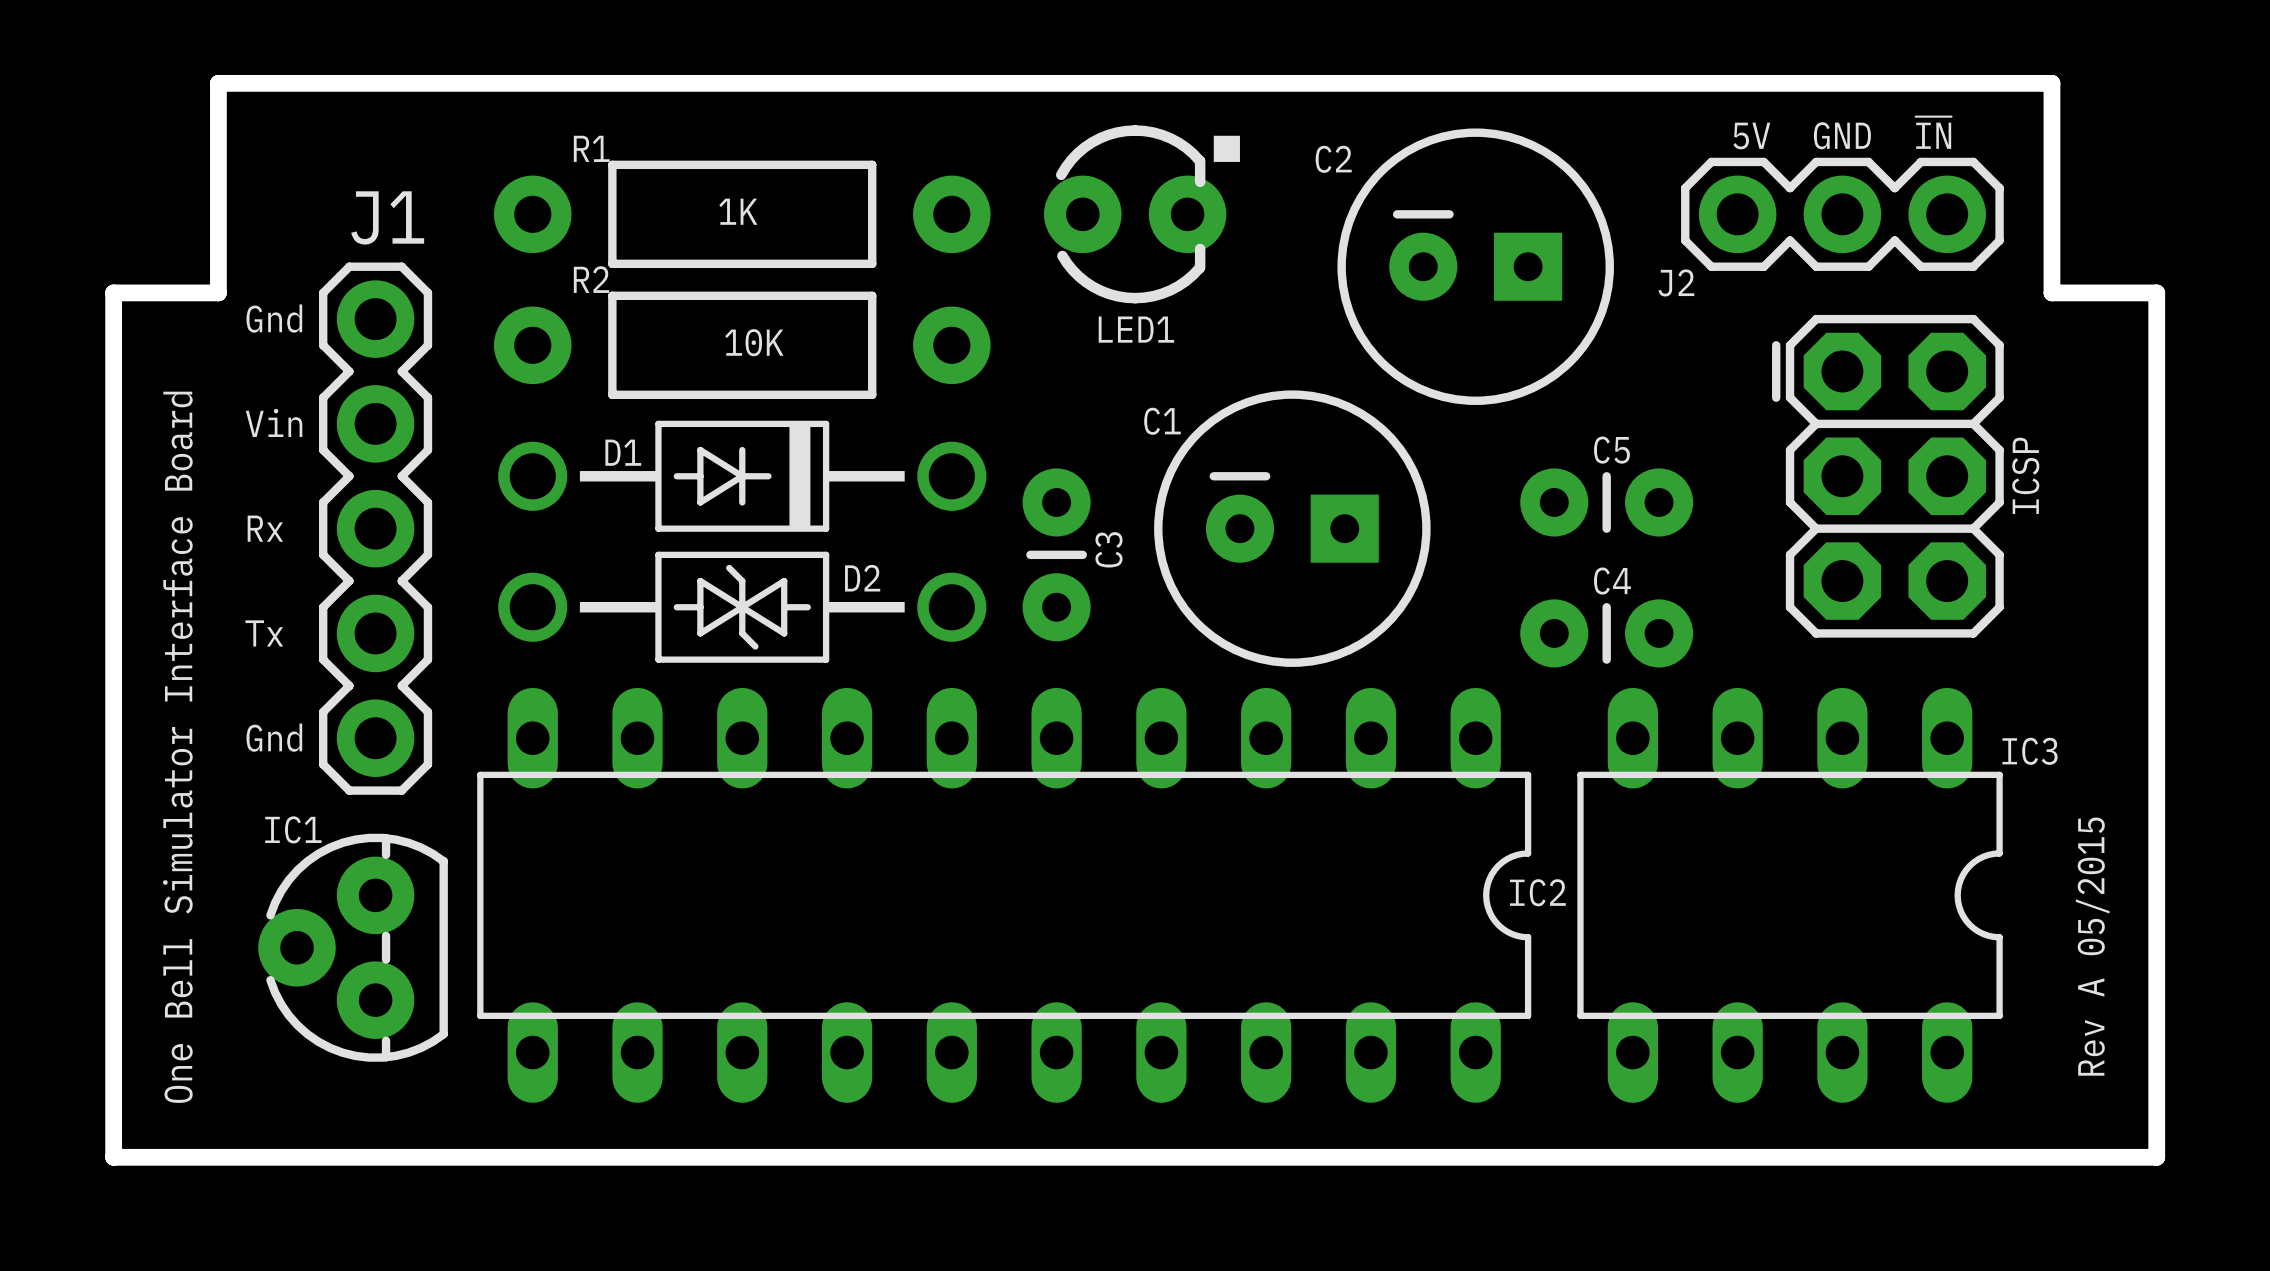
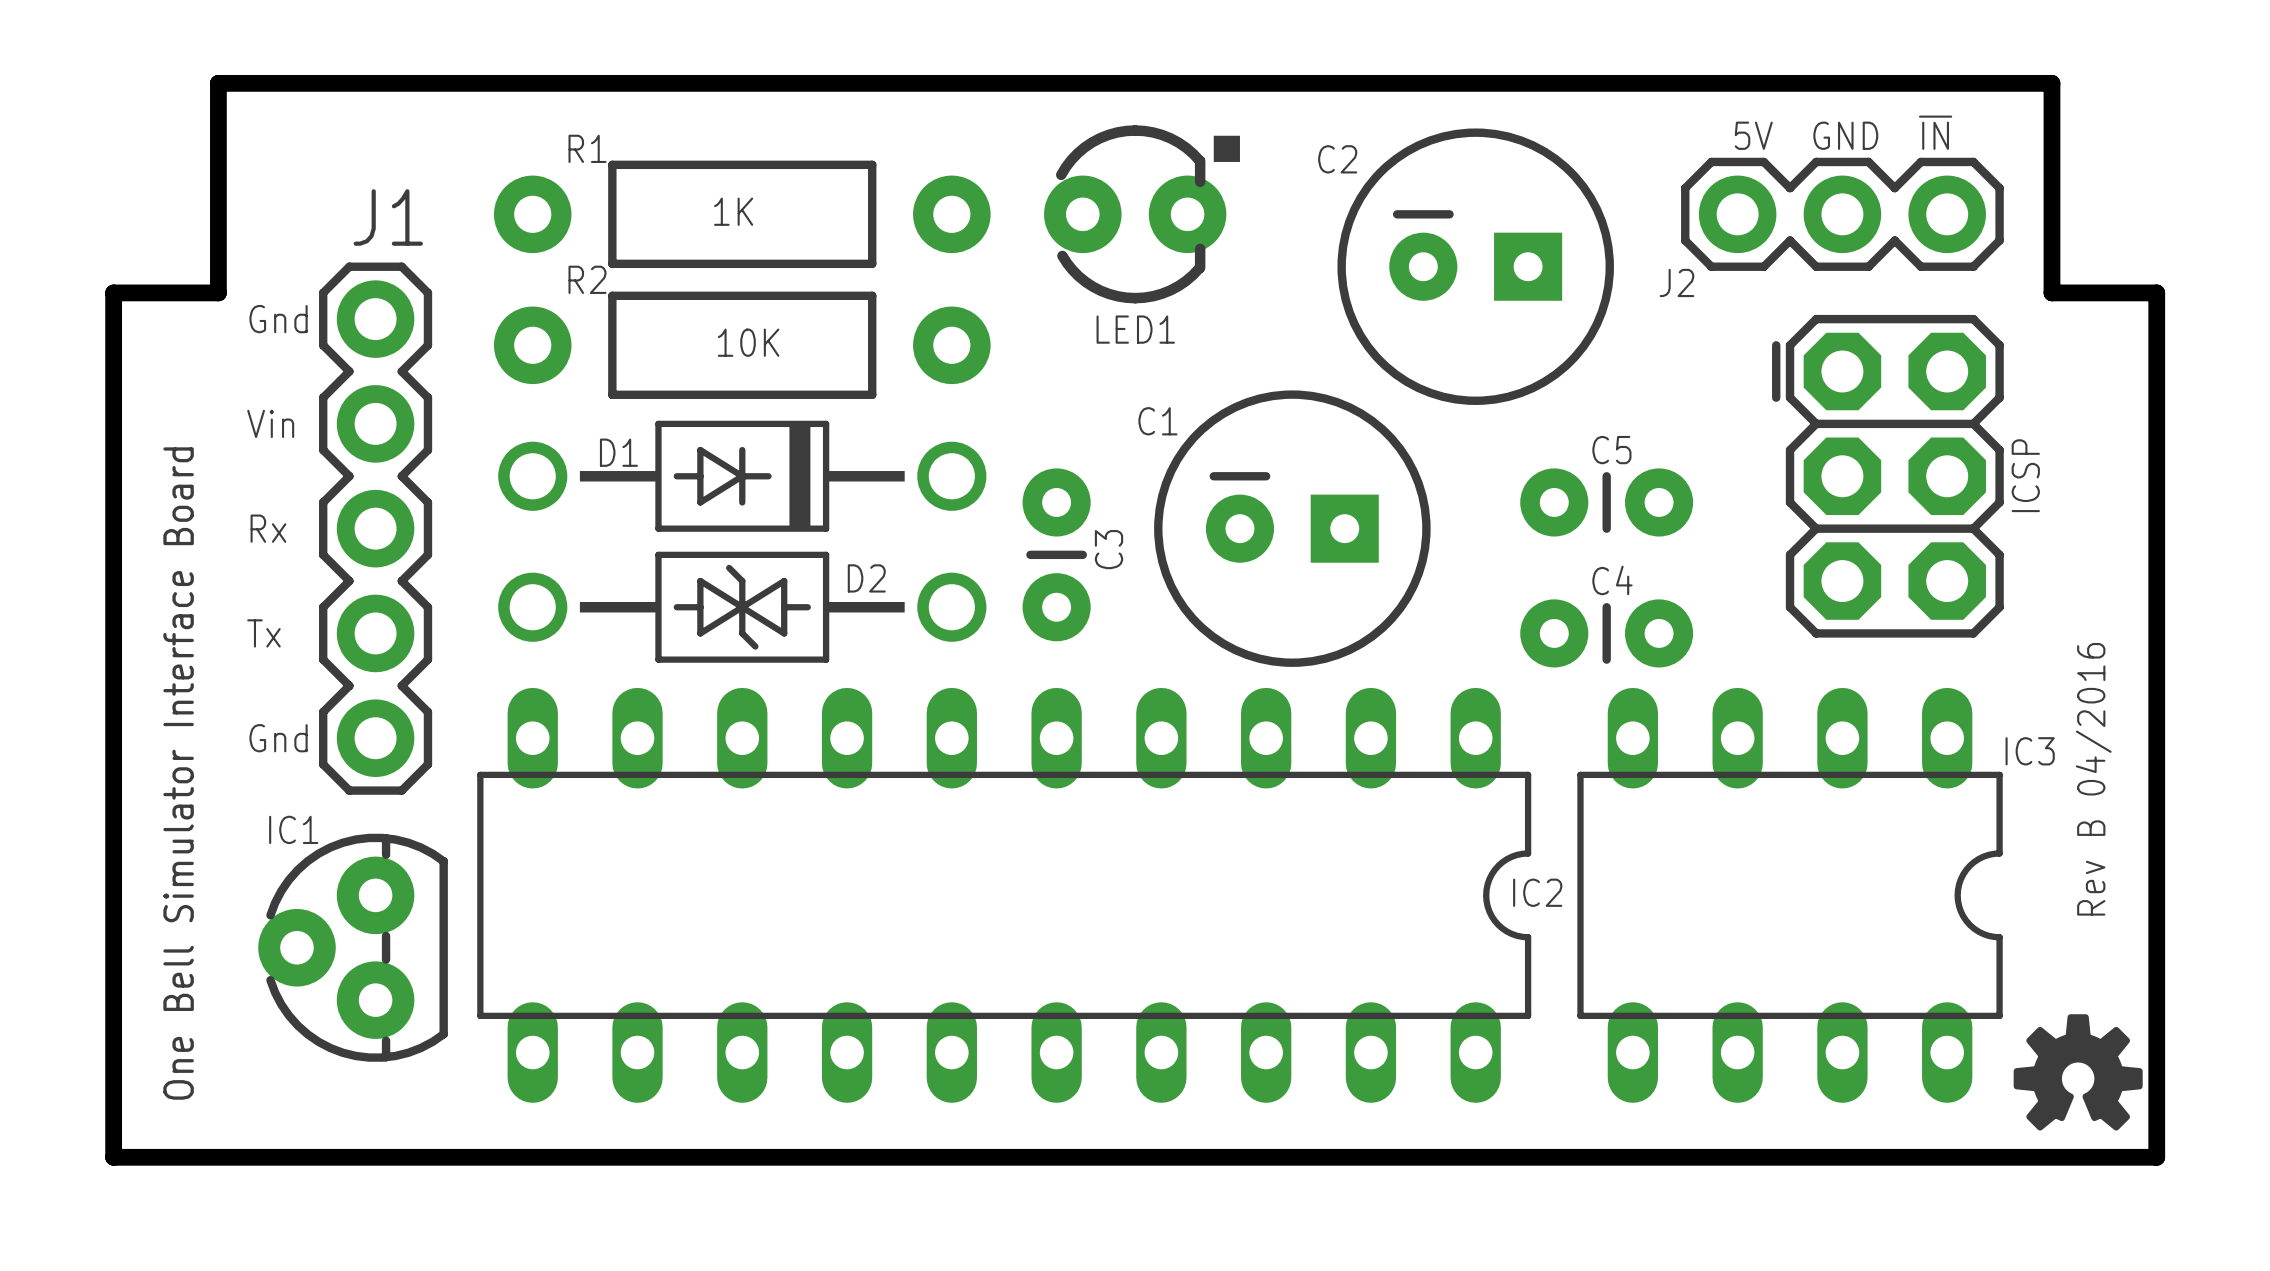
text: Rev A 05/2015 (2092, 946) -> Rev B 04/2016 (2093, 779)
drawing: none -> [2013, 1014, 2143, 1131]

